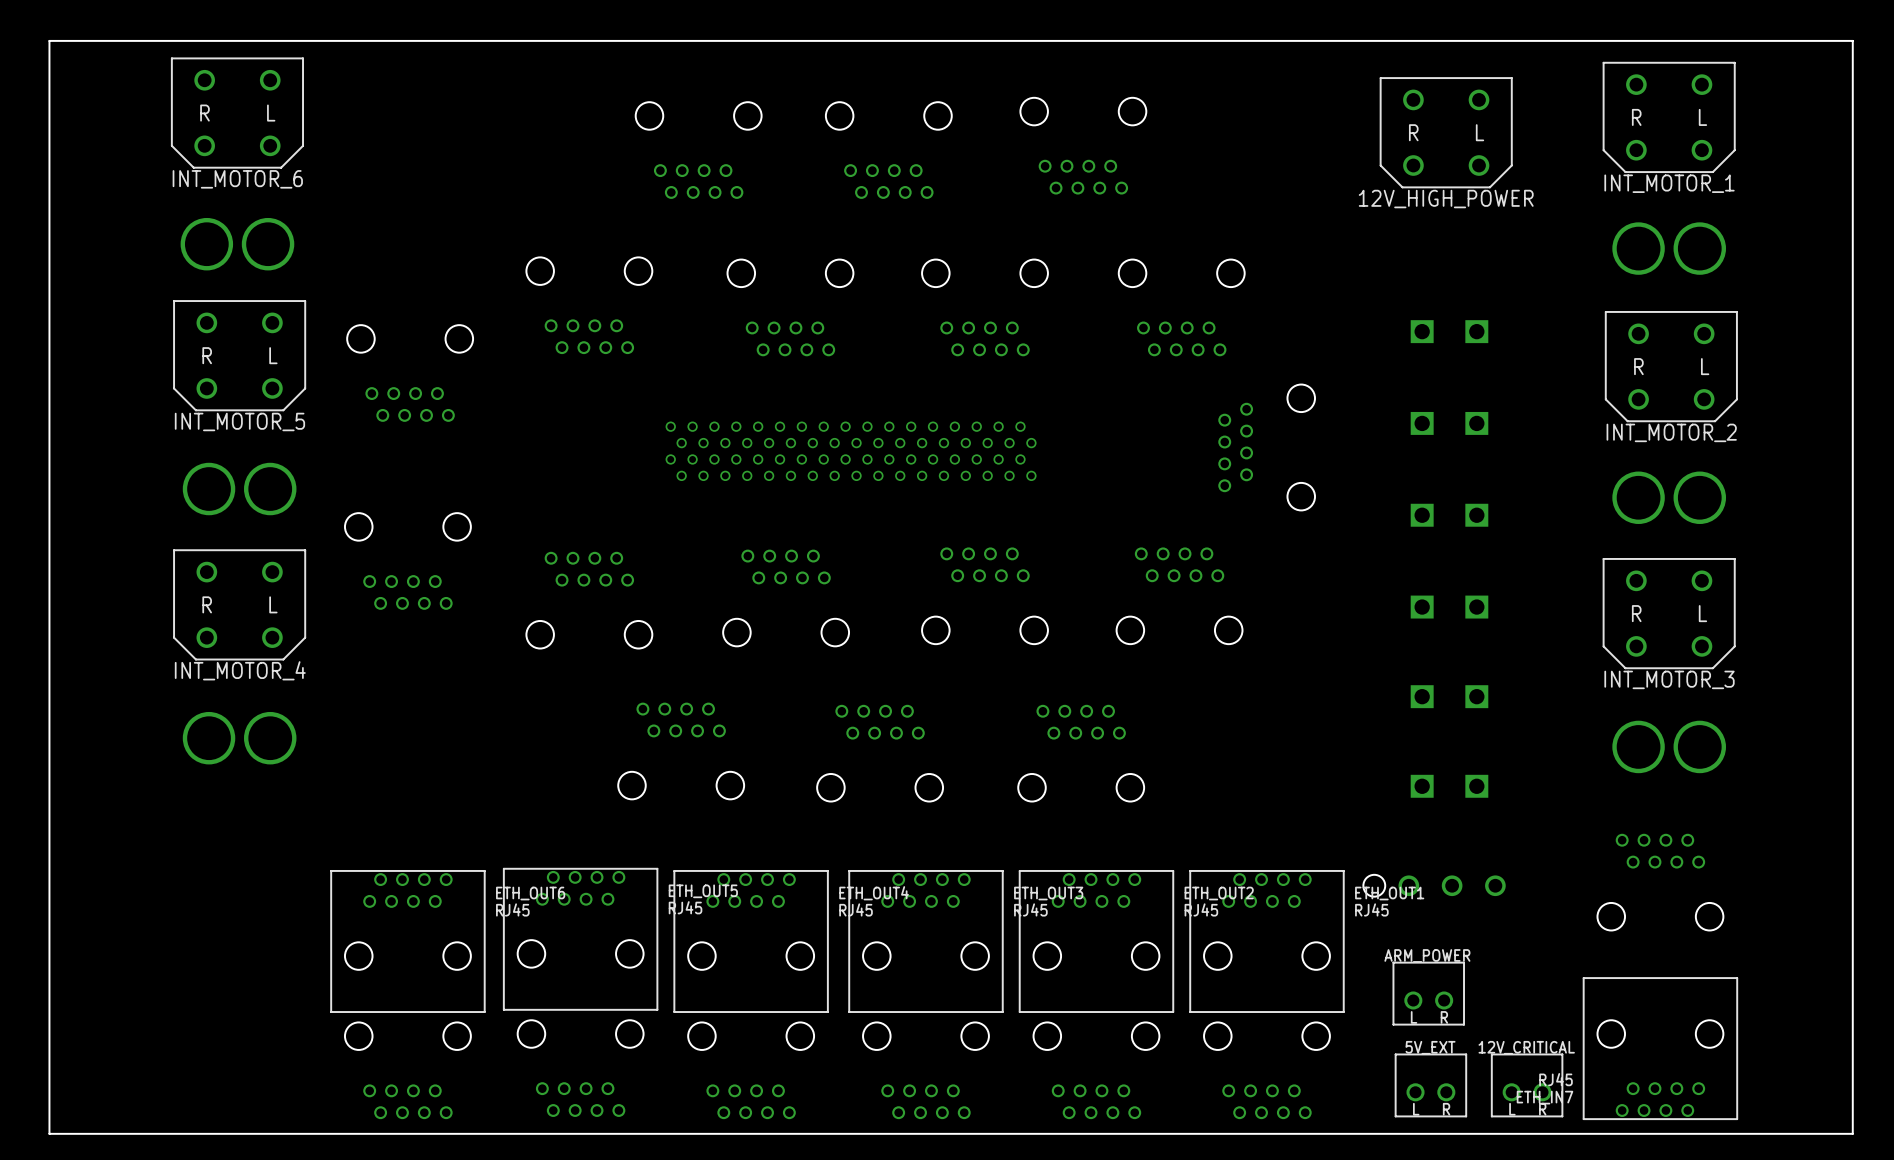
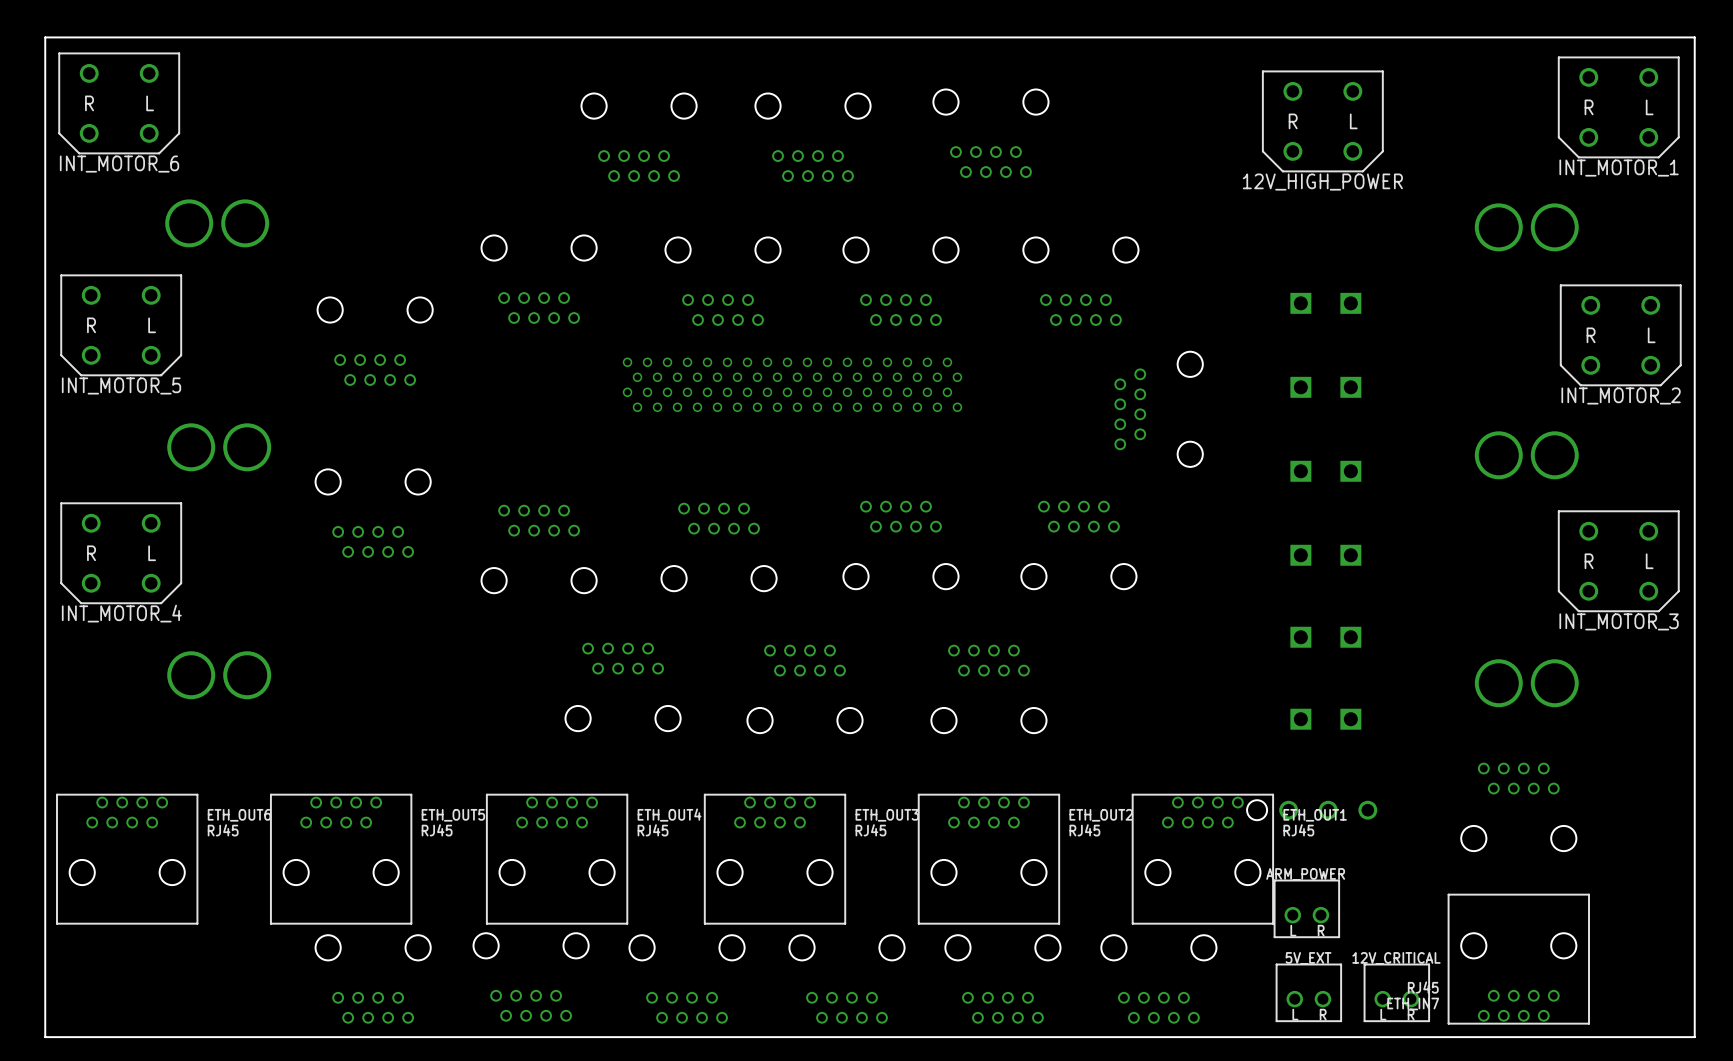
INT_MOTOR_6 position: (237, 113) -> (119, 103)
INT_MOTOR_1 position: (1669, 117) -> (1618, 107)
INT_MOTOR_5 position: (239, 355) -> (121, 325)
INT_MOTOR_2 position: (1671, 366) -> (1620, 335)
part position: (851, 451) -> (792, 384)
INT_MOTOR_4 position: (239, 604) -> (121, 553)
INT_MOTOR_3 position: (1669, 613) -> (1618, 561)
ETH_OUT5 position: (580, 939) -> (341, 859)
ETH_OUT6 position: (407, 941) -> (127, 859)
ETH_OUT4 position: (751, 941) -> (557, 859)
ETH_OUT3 position: (925, 941) -> (775, 859)
ETH_OUT2 position: (1096, 941) -> (988, 859)
ETH_OUT1 position: (1266, 941) -> (1202, 859)

